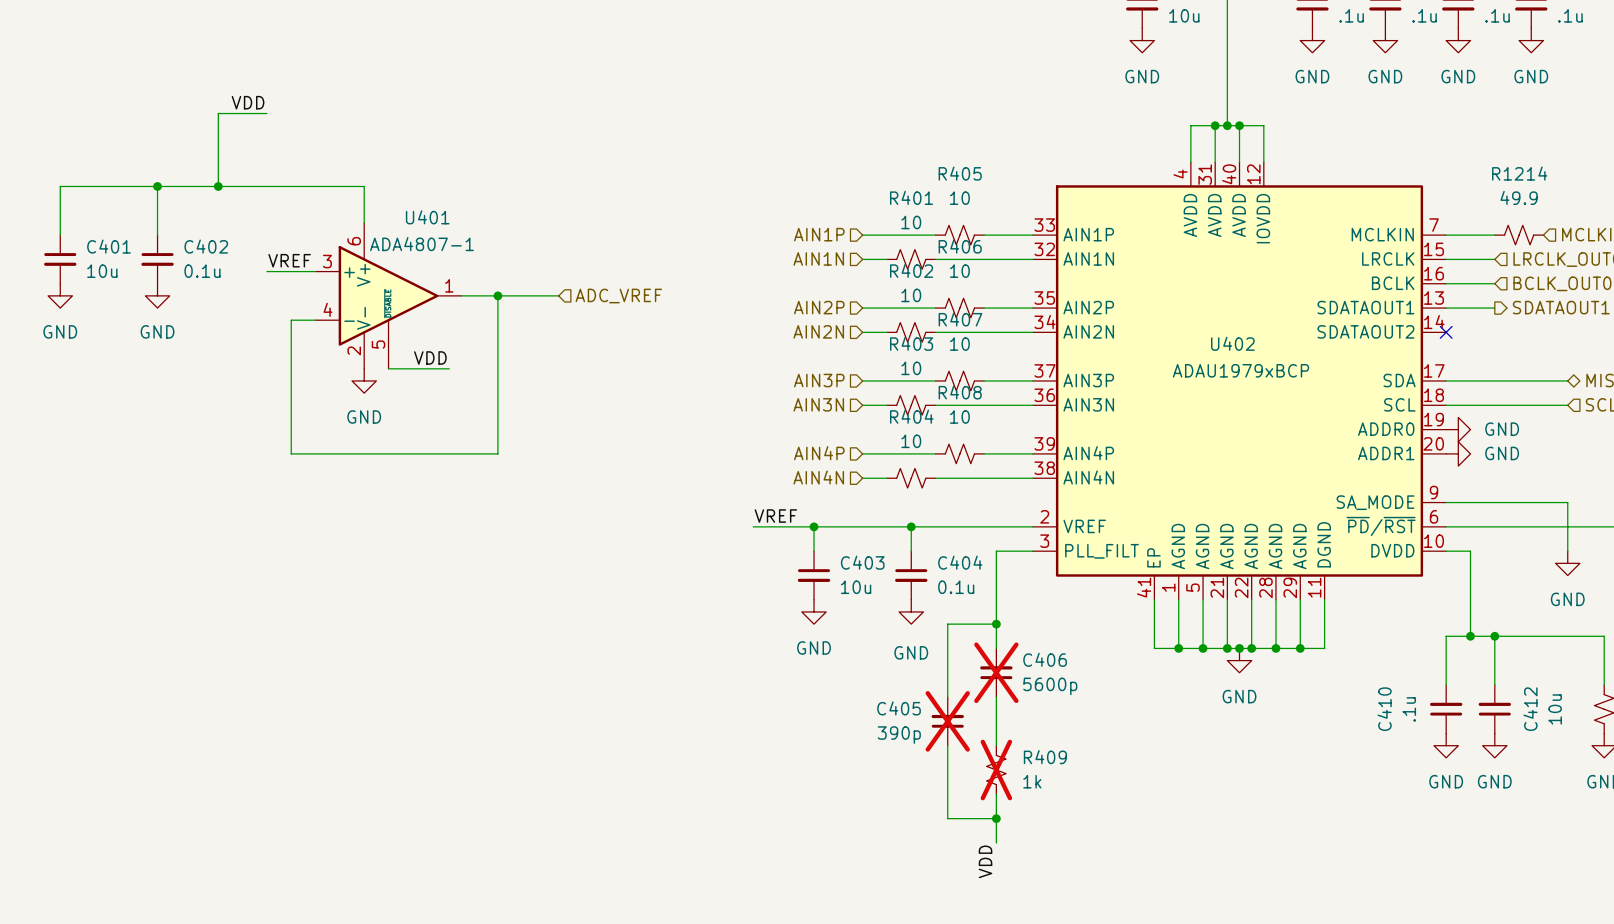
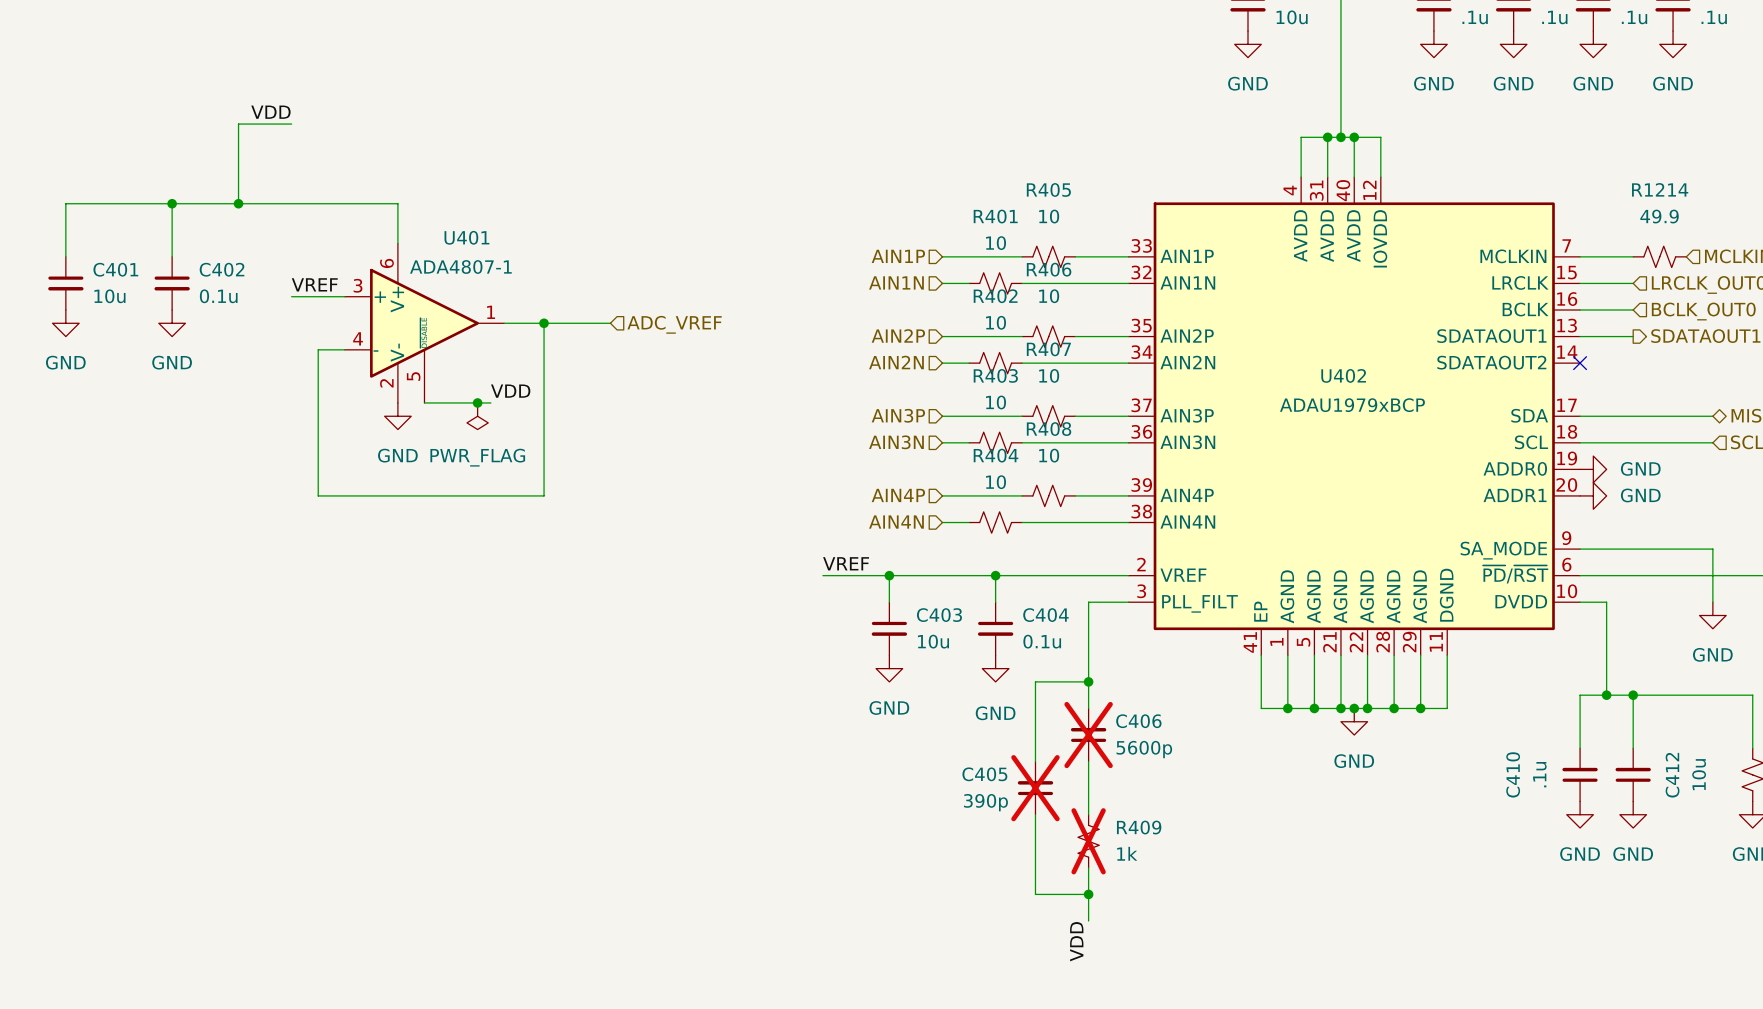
label position: VDD (430, 357) -> VDD (510, 391)
junction: none -> (477, 402)
power symbol: none -> PWR_FLAG (477, 416)

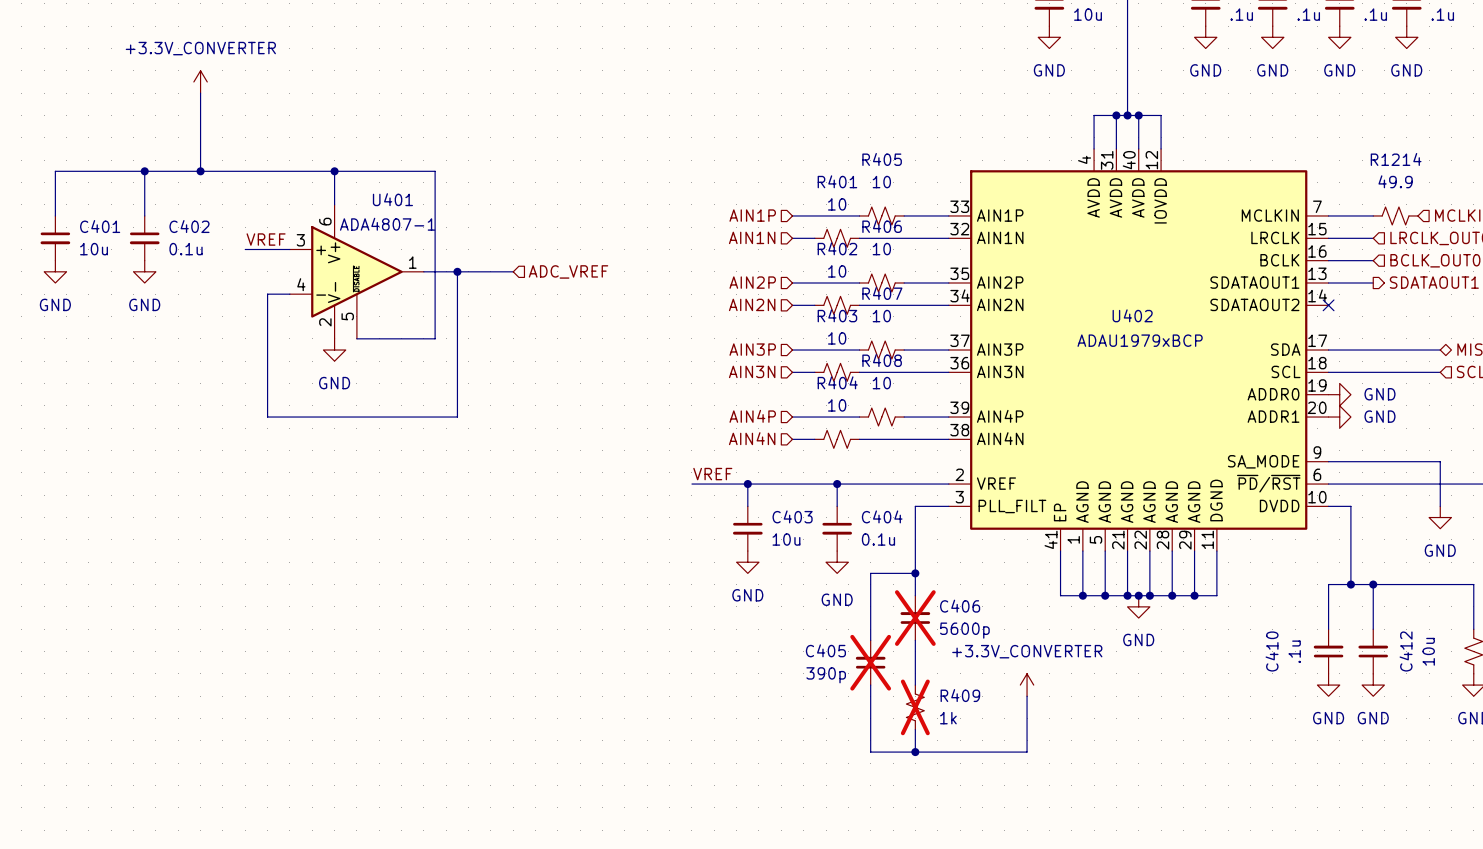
power symbol: none -> +3.3V_CONVERTER (200, 81)
label: VDD (270, 112) -> none
wire: (238, 124) (291, 124) -> (200, 104) (200, 93)
wire: none -> (334, 171) (435, 171) (435, 338) (412, 338)
junction: none -> (334, 171)
label: VDD (510, 391) -> none
junction: (477, 402) -> none
power symbol: PWR_FLAG (477, 416) -> none
power symbol: none -> +3.3V_CONVERTER (1027, 685)
wire: (1088, 894) (1088, 920) -> (915, 752) (1027, 752) (1027, 696)
label: VDD (1076, 941) -> none

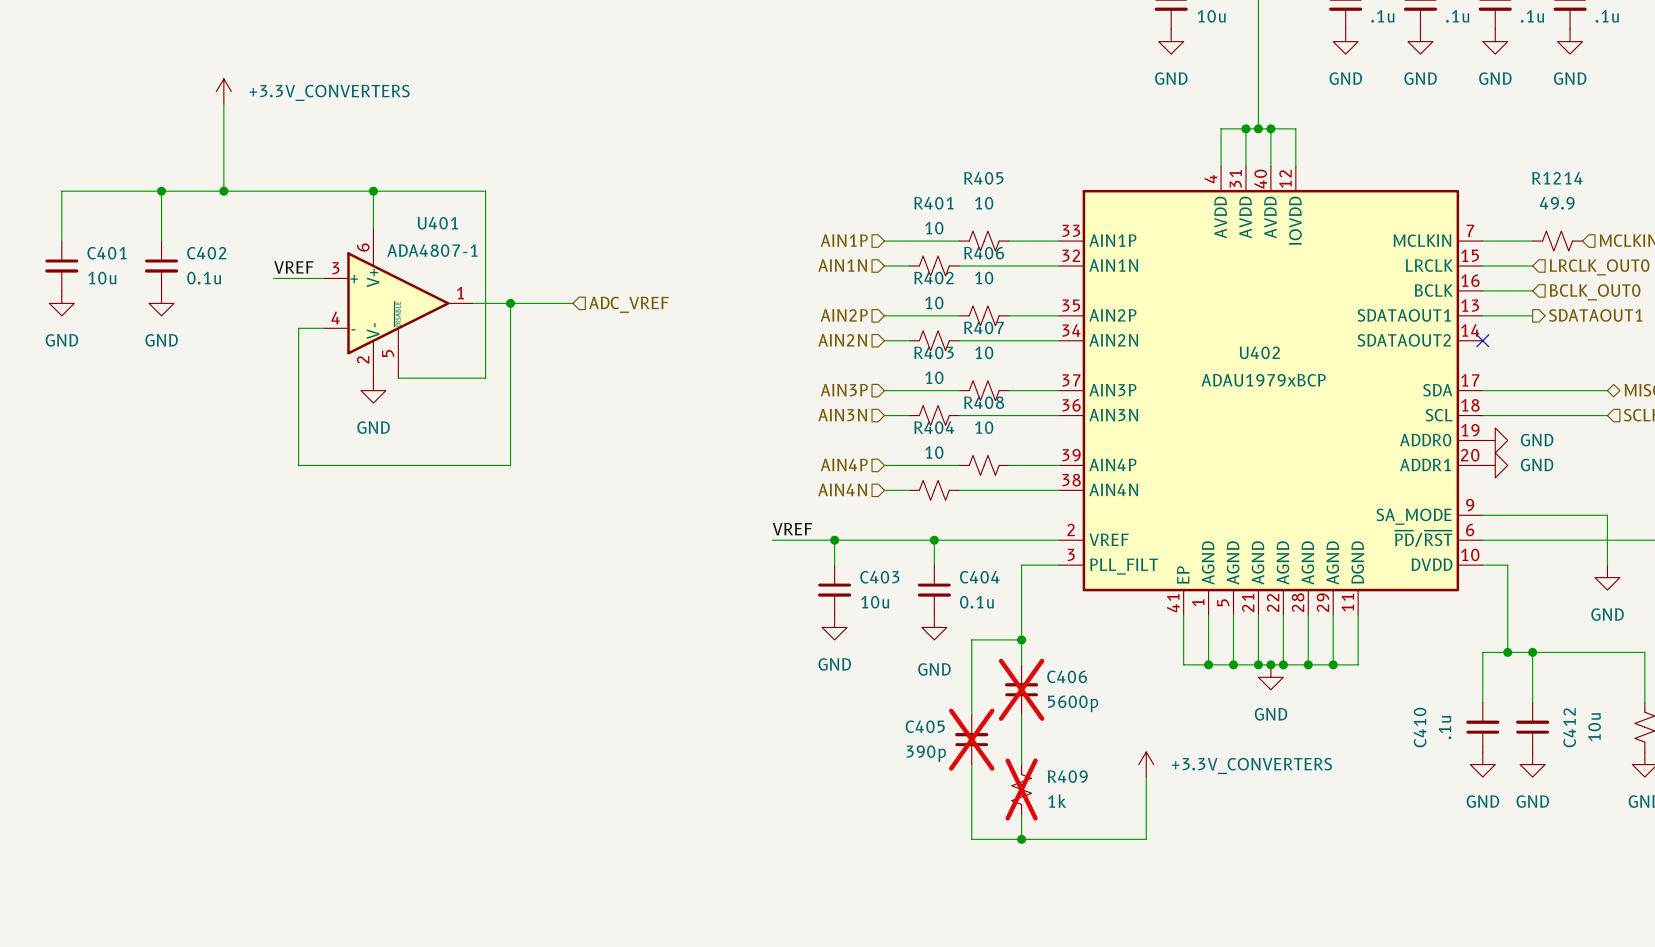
power symbol: +3.3V_CONVERTER (200, 81) -> +3.3V_CONVERTERS (223, 91)
power symbol: +3.3V_CONVERTER (1027, 685) -> +3.3V_CONVERTERS (1146, 764)

